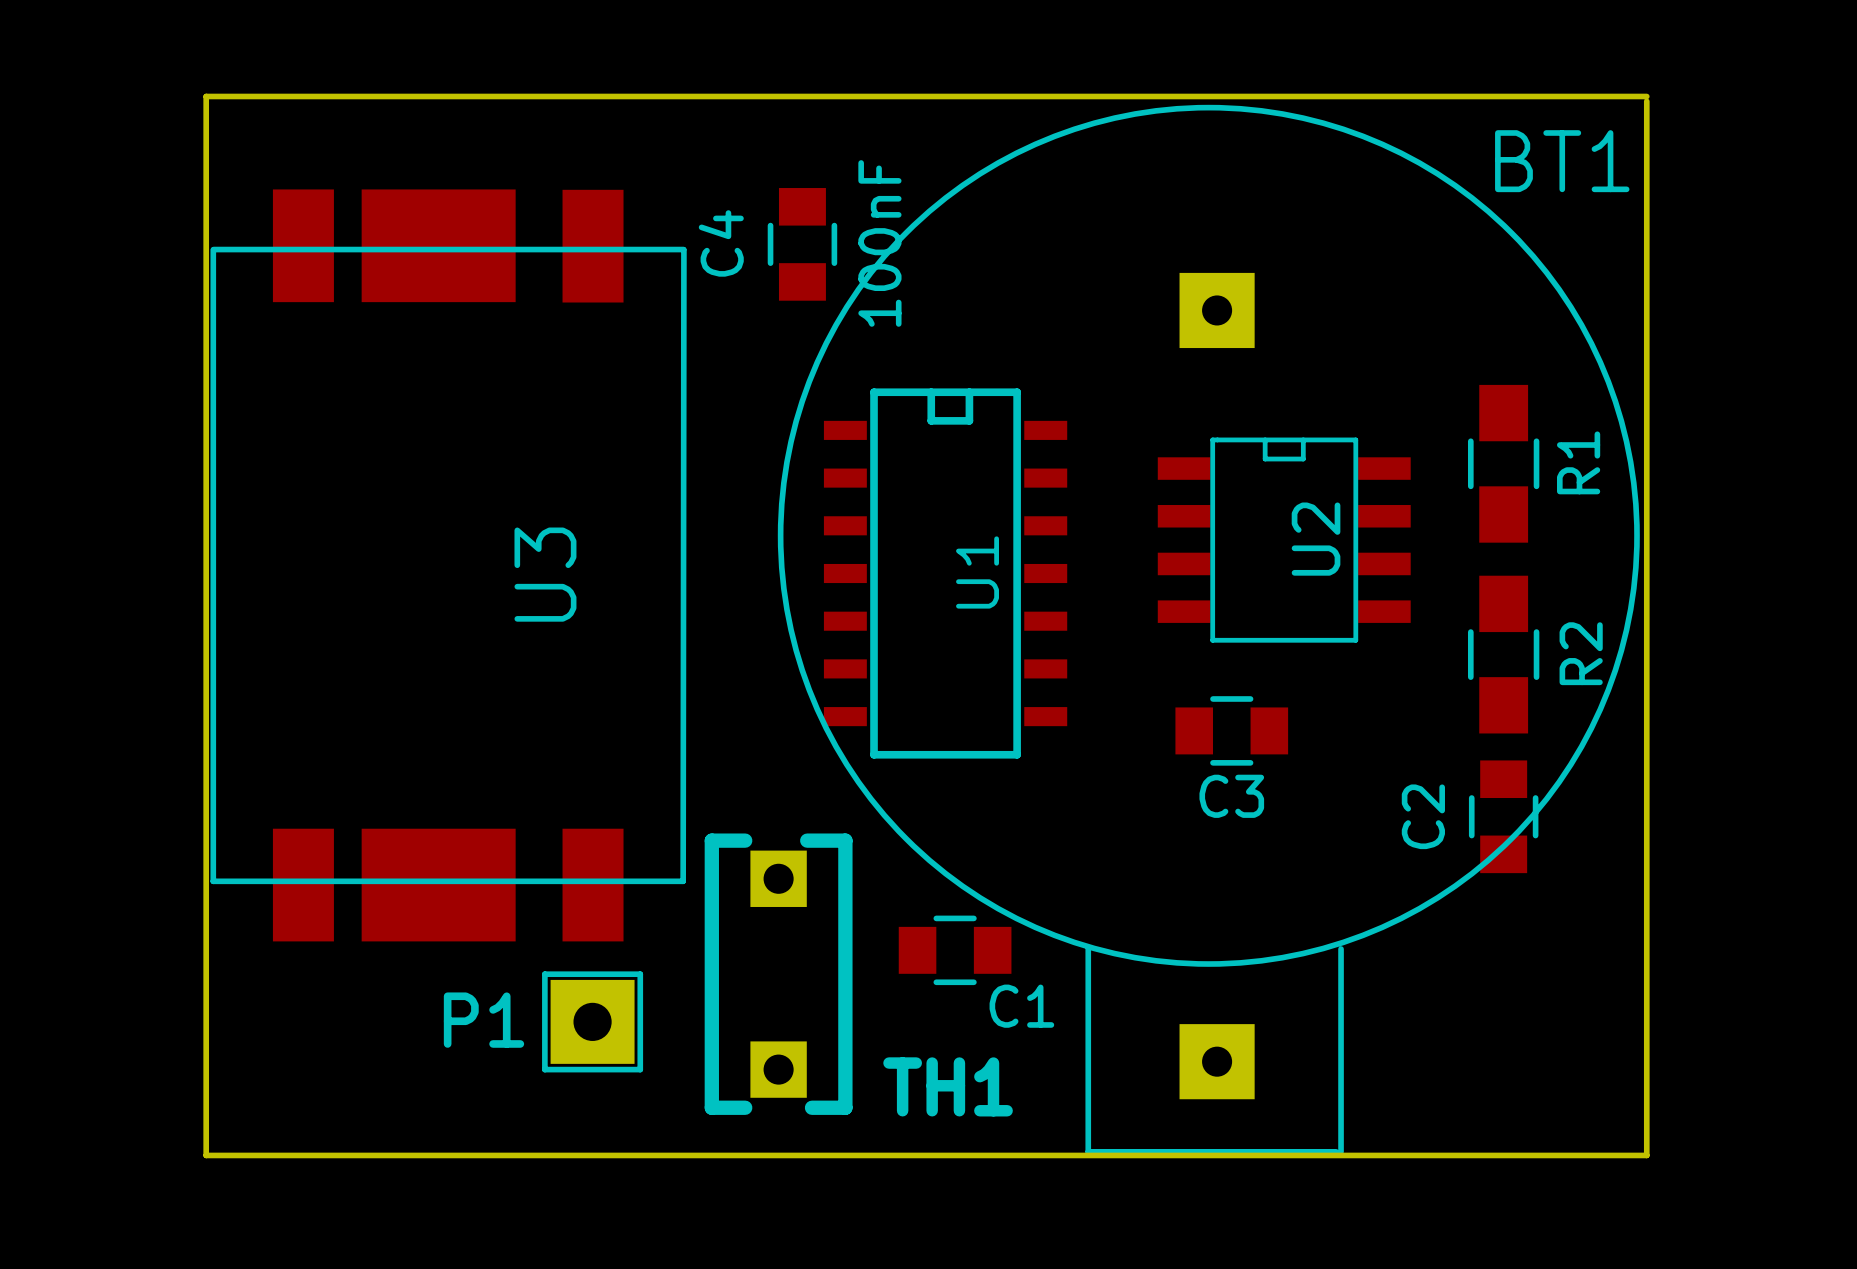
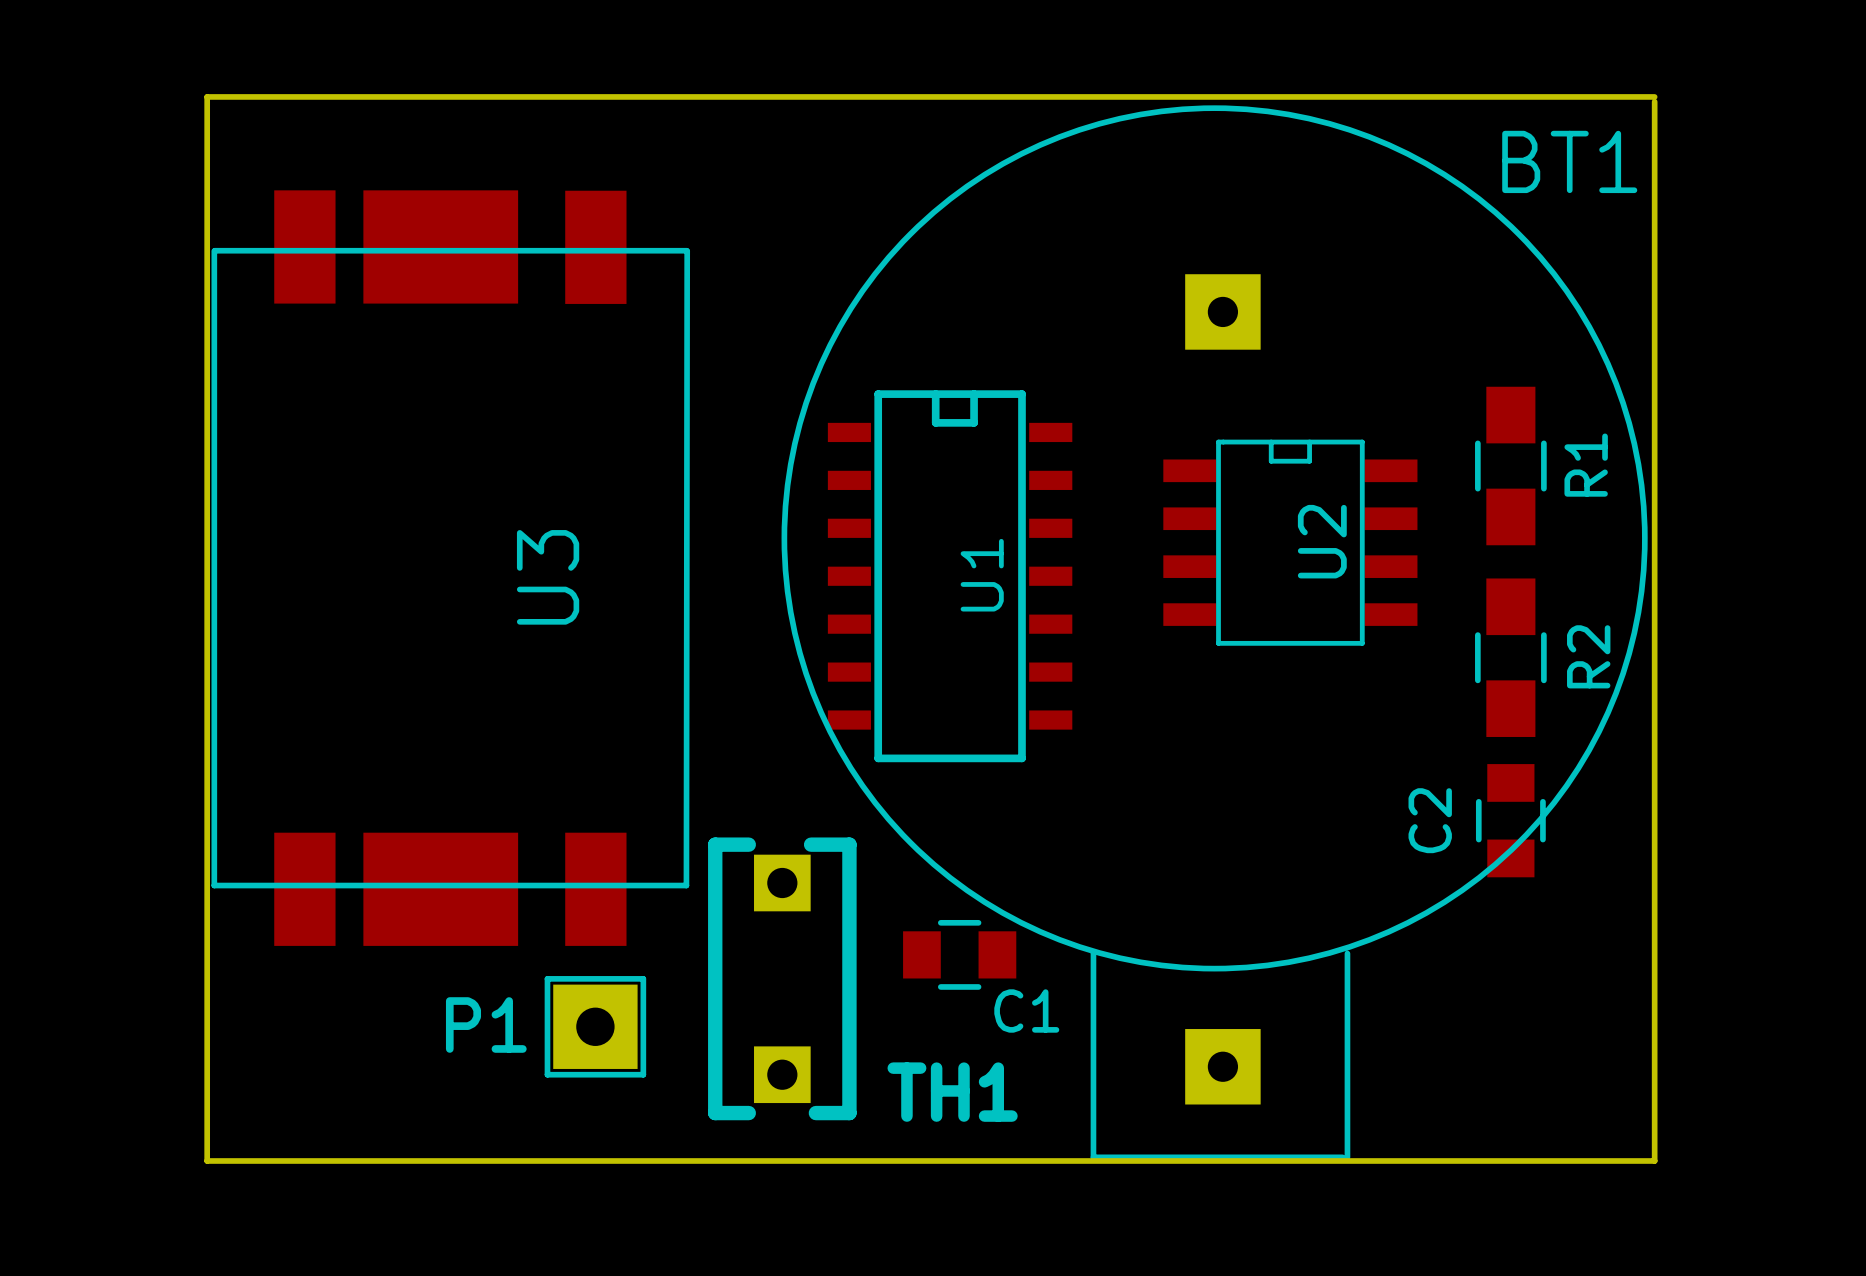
C4: 100nF (802, 244) -> none
C3: (1231, 730) -> none

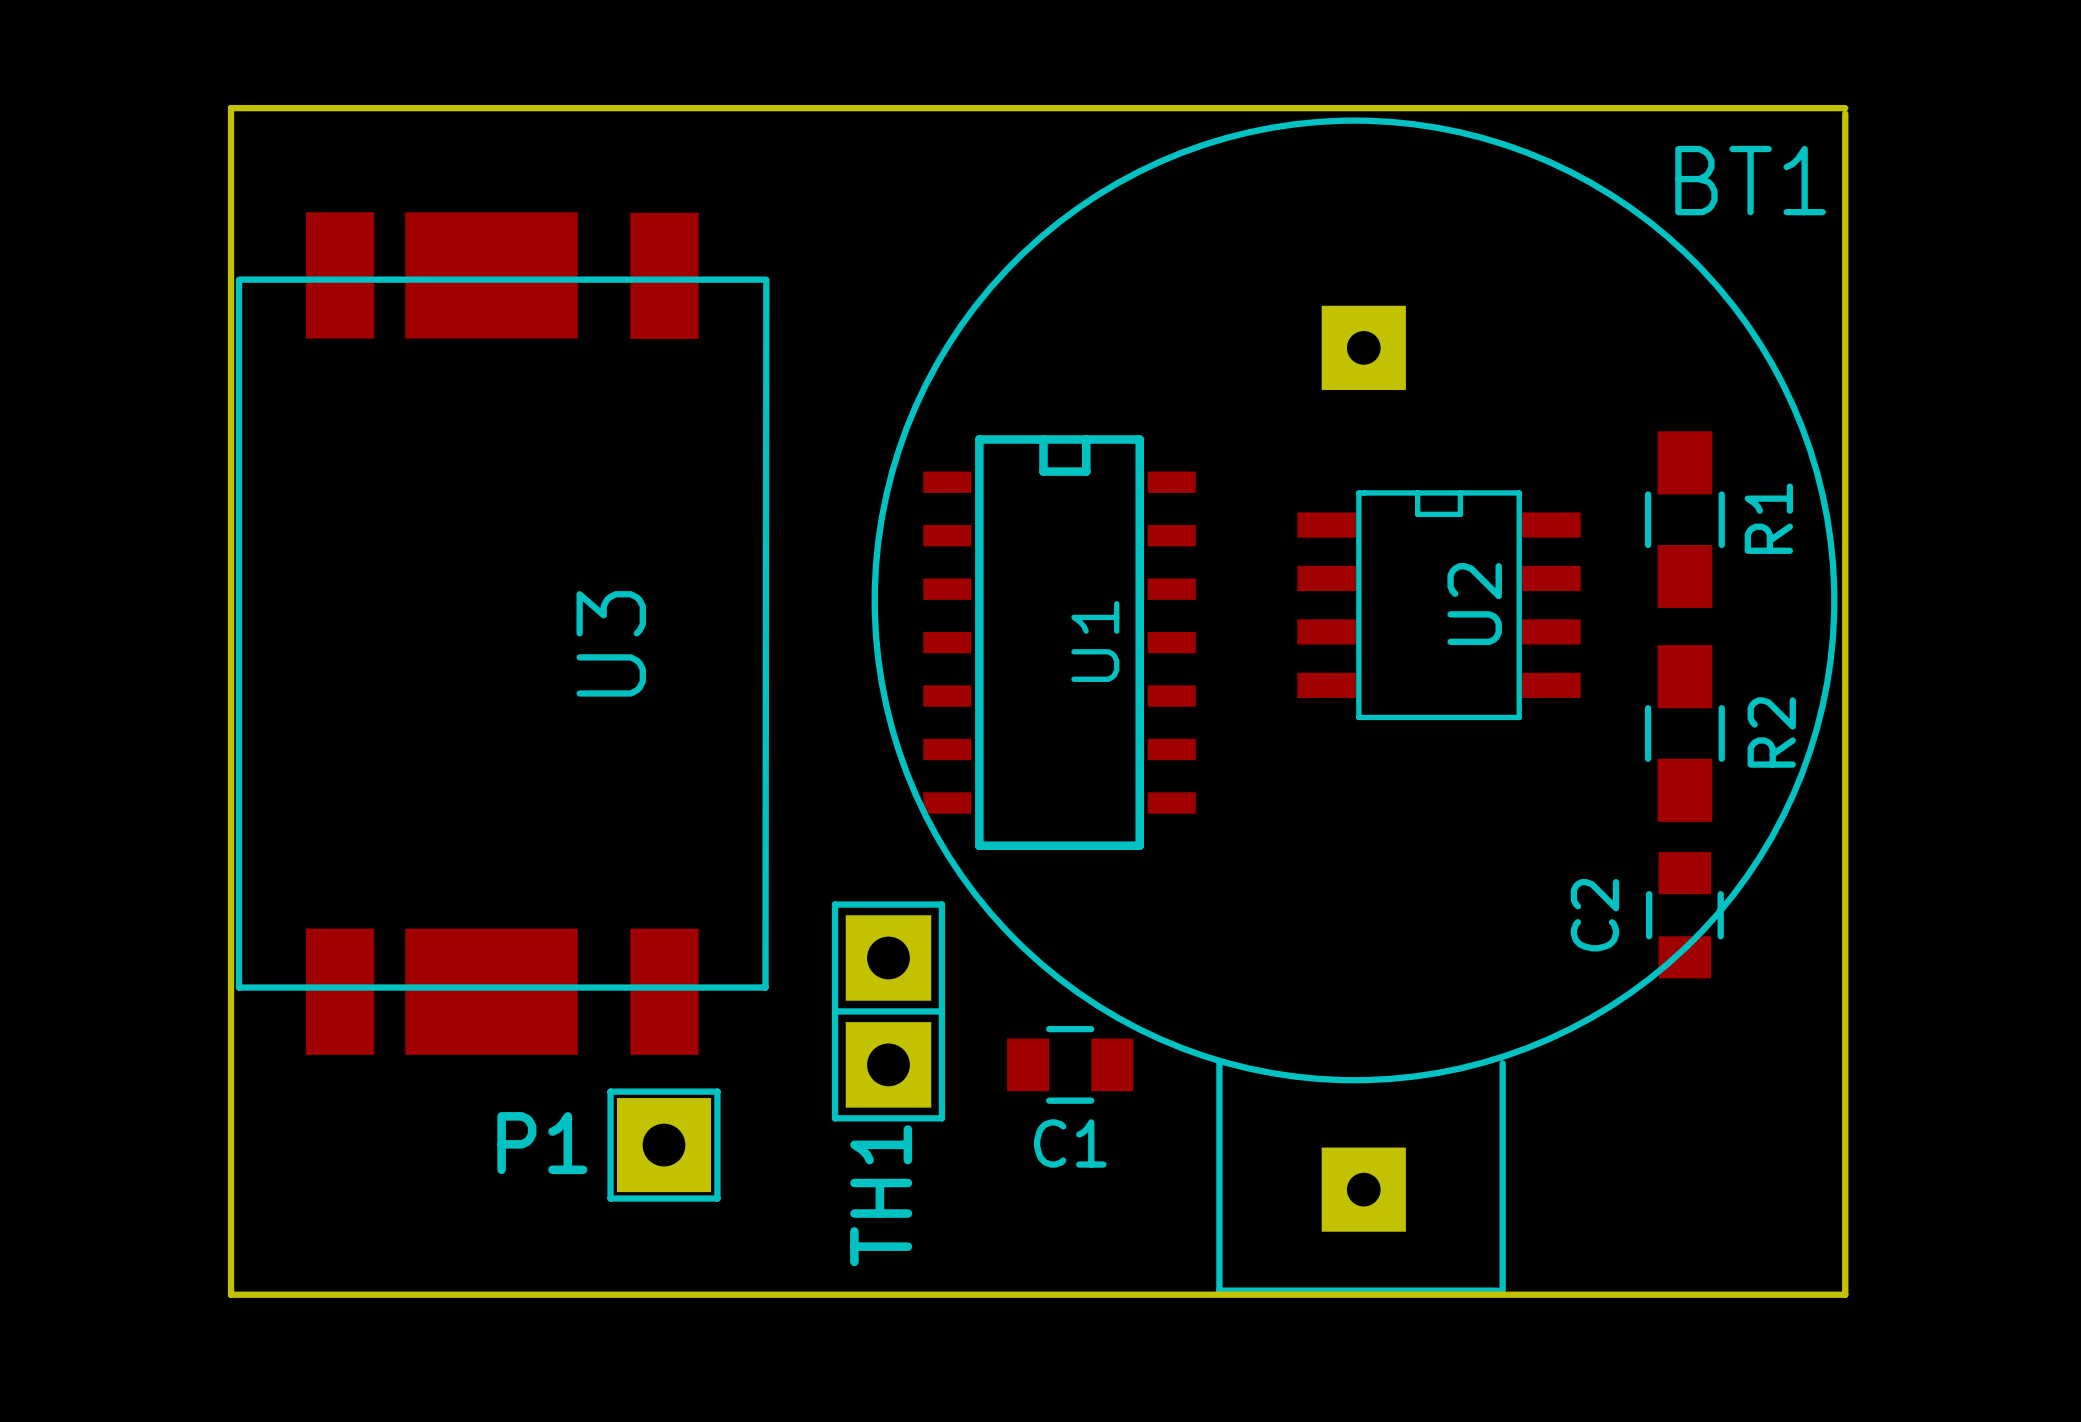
TH1 footprint: [708, 837, 857, 1121] -> [831, 901, 946, 1122]
C1 name position: C1 (1026, 1011) -> C1 (1070, 1143)
TH1 name position: TH1 (952, 1092) -> TH1 (881, 1195)

